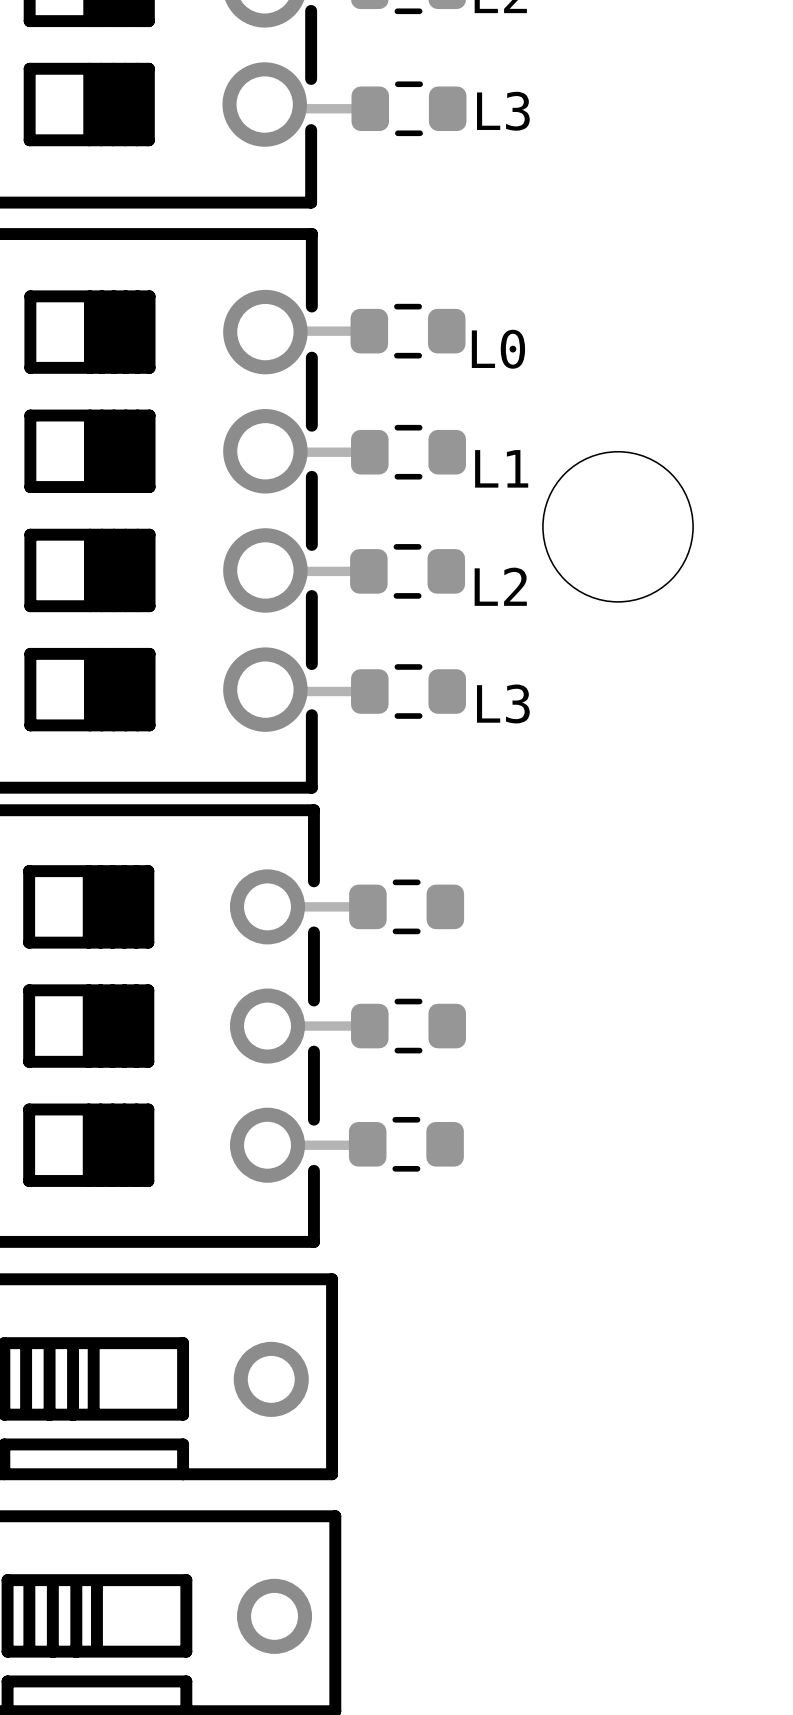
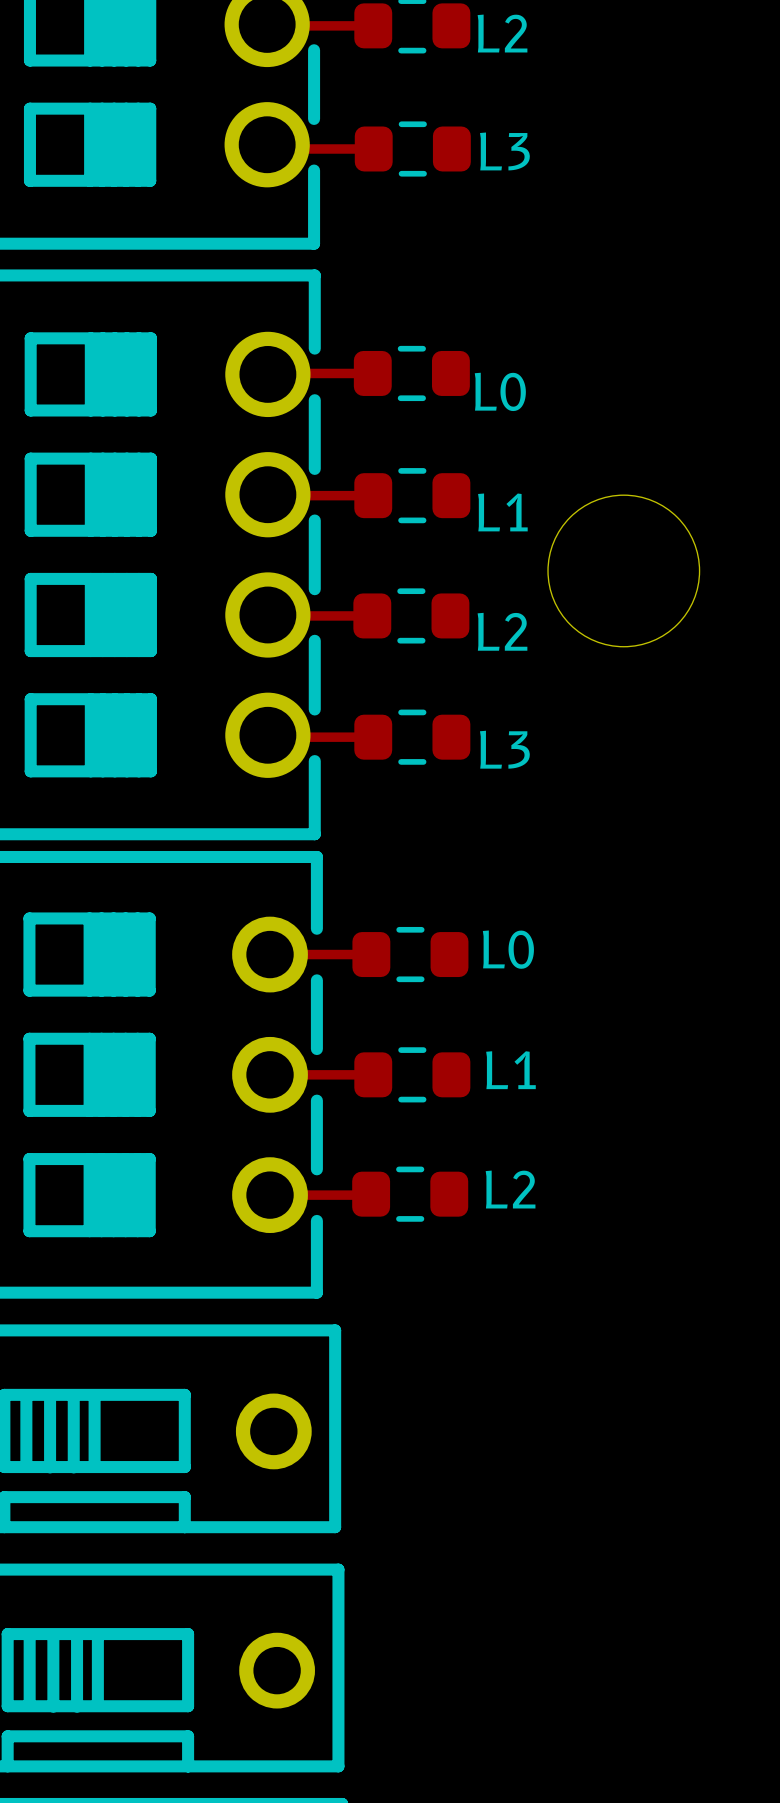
text: none -> L0 (508, 949)
text: none -> L1 (510, 1070)
text: none -> L2 (510, 1189)

